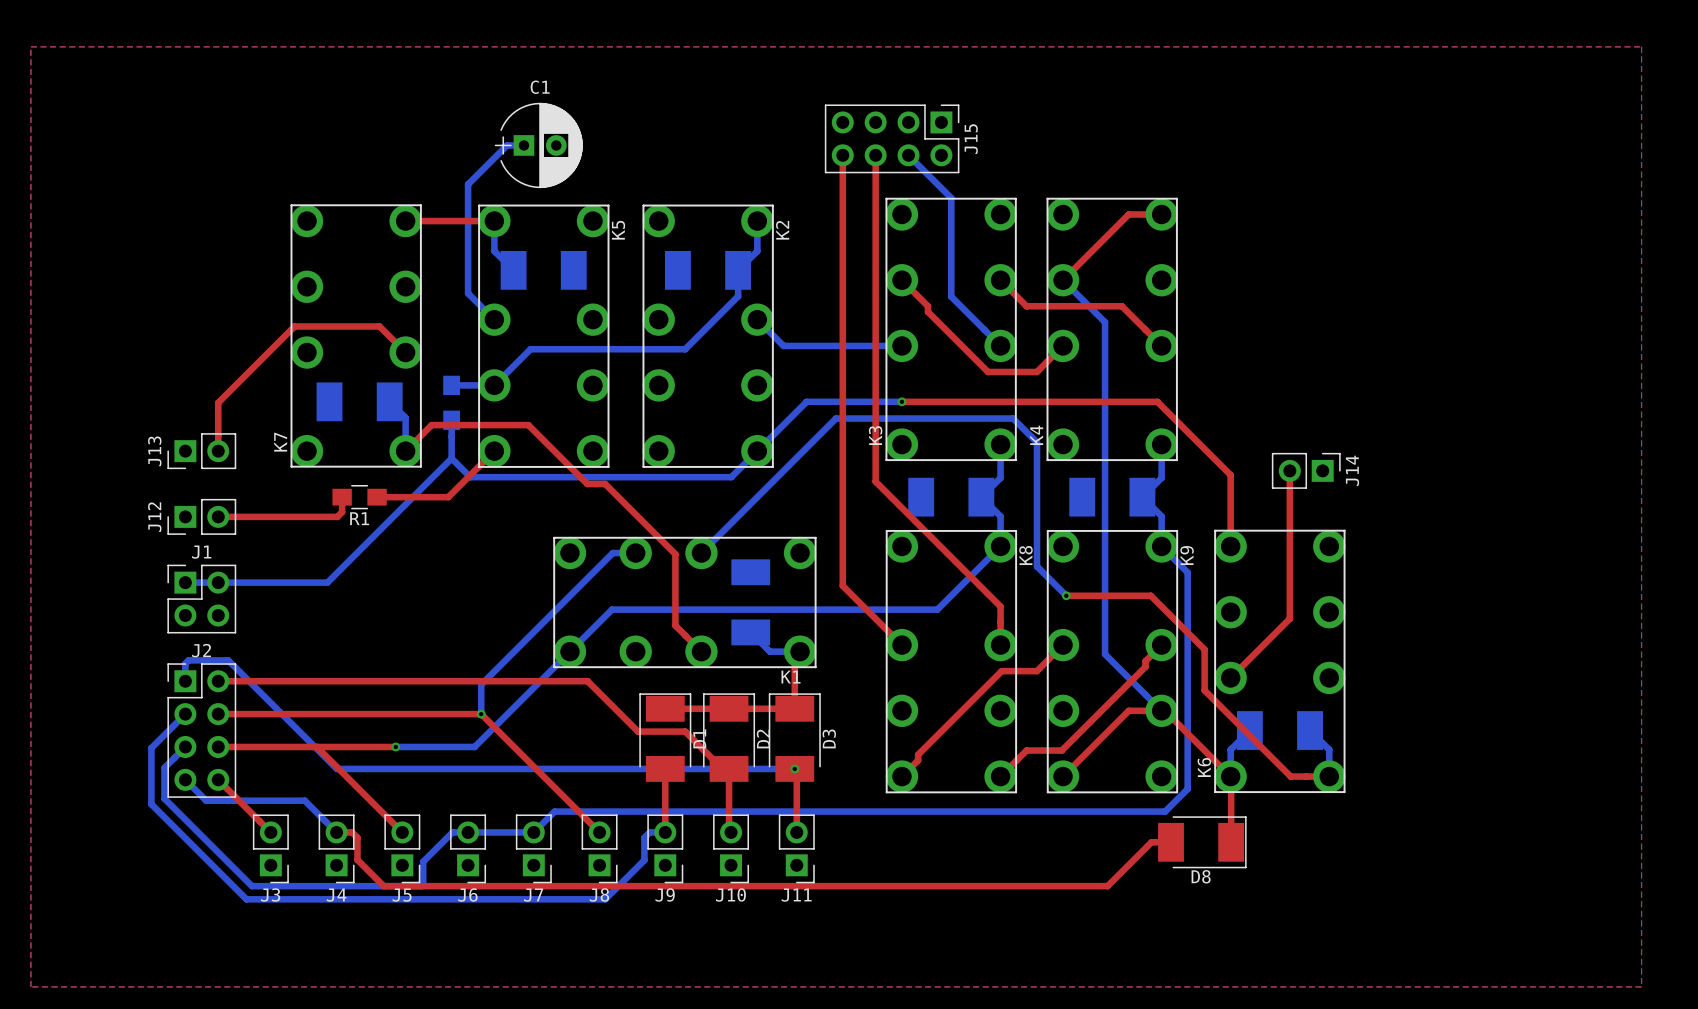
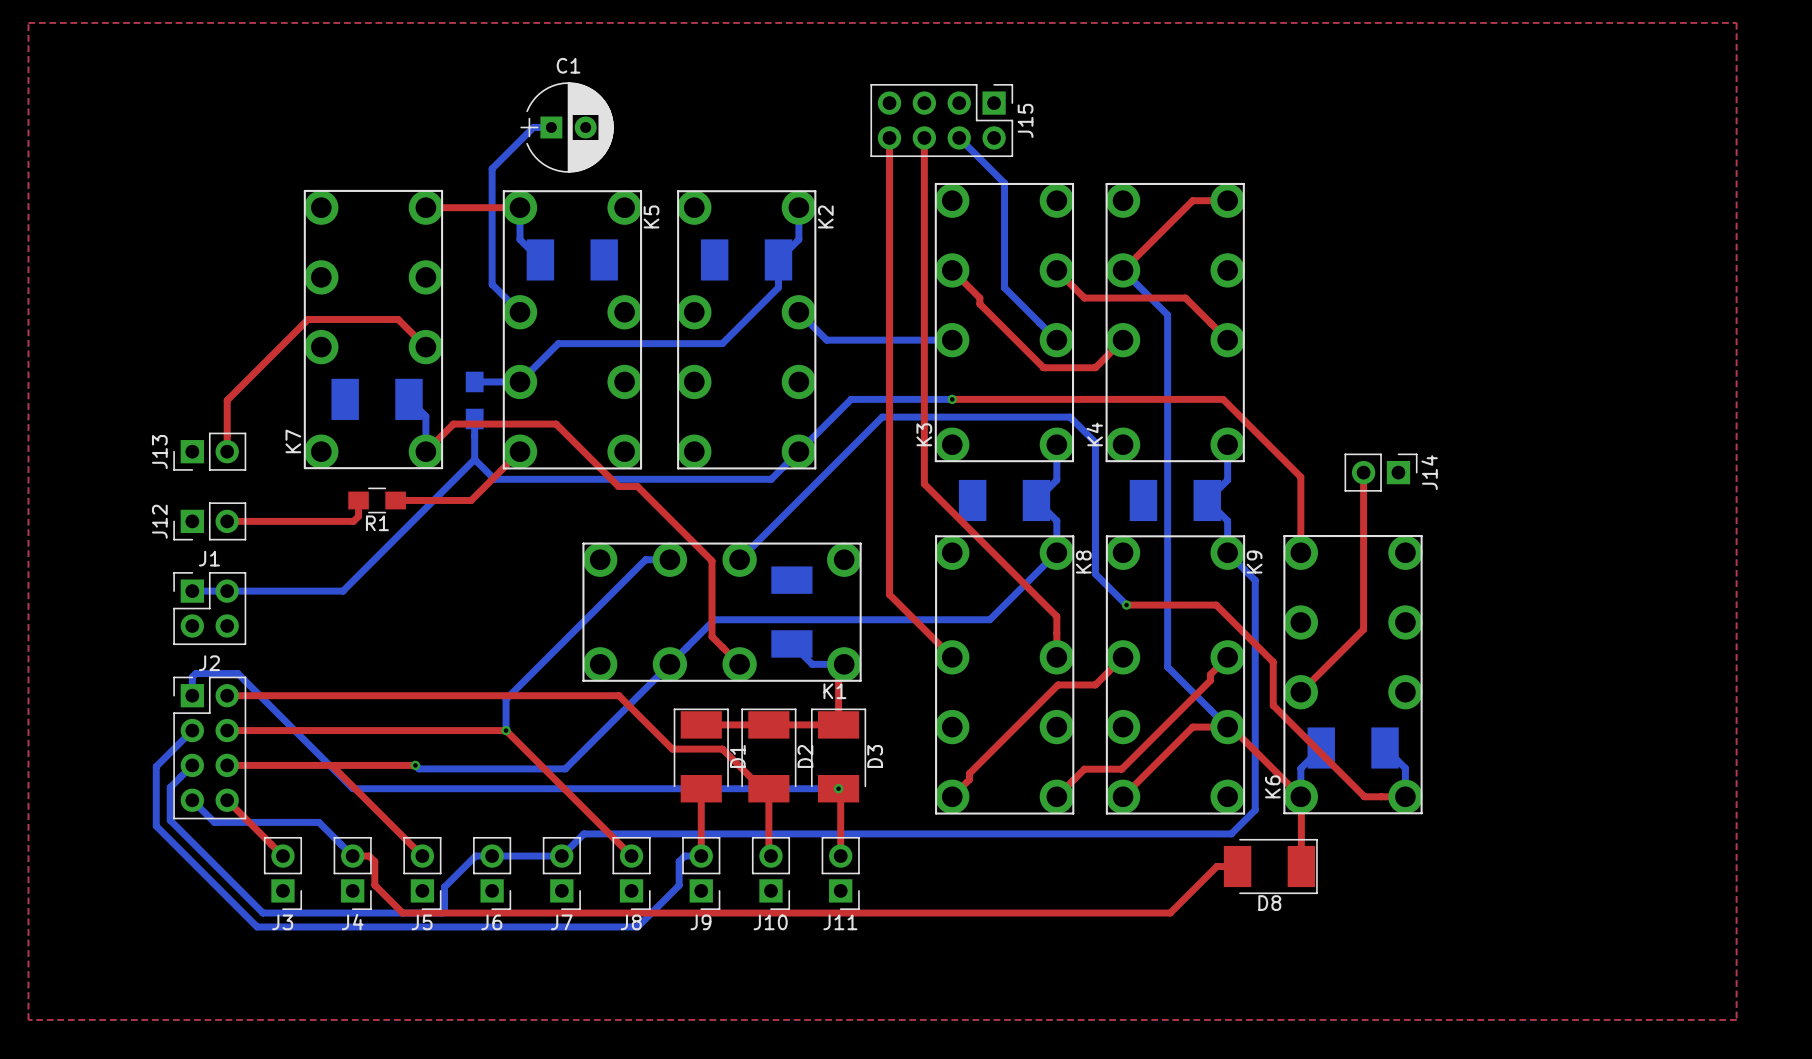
bottom track: (677, 609) (611, 609) (474, 746) (395, 746) -> (714, 619) (565, 768) (418, 768) (415, 765)

